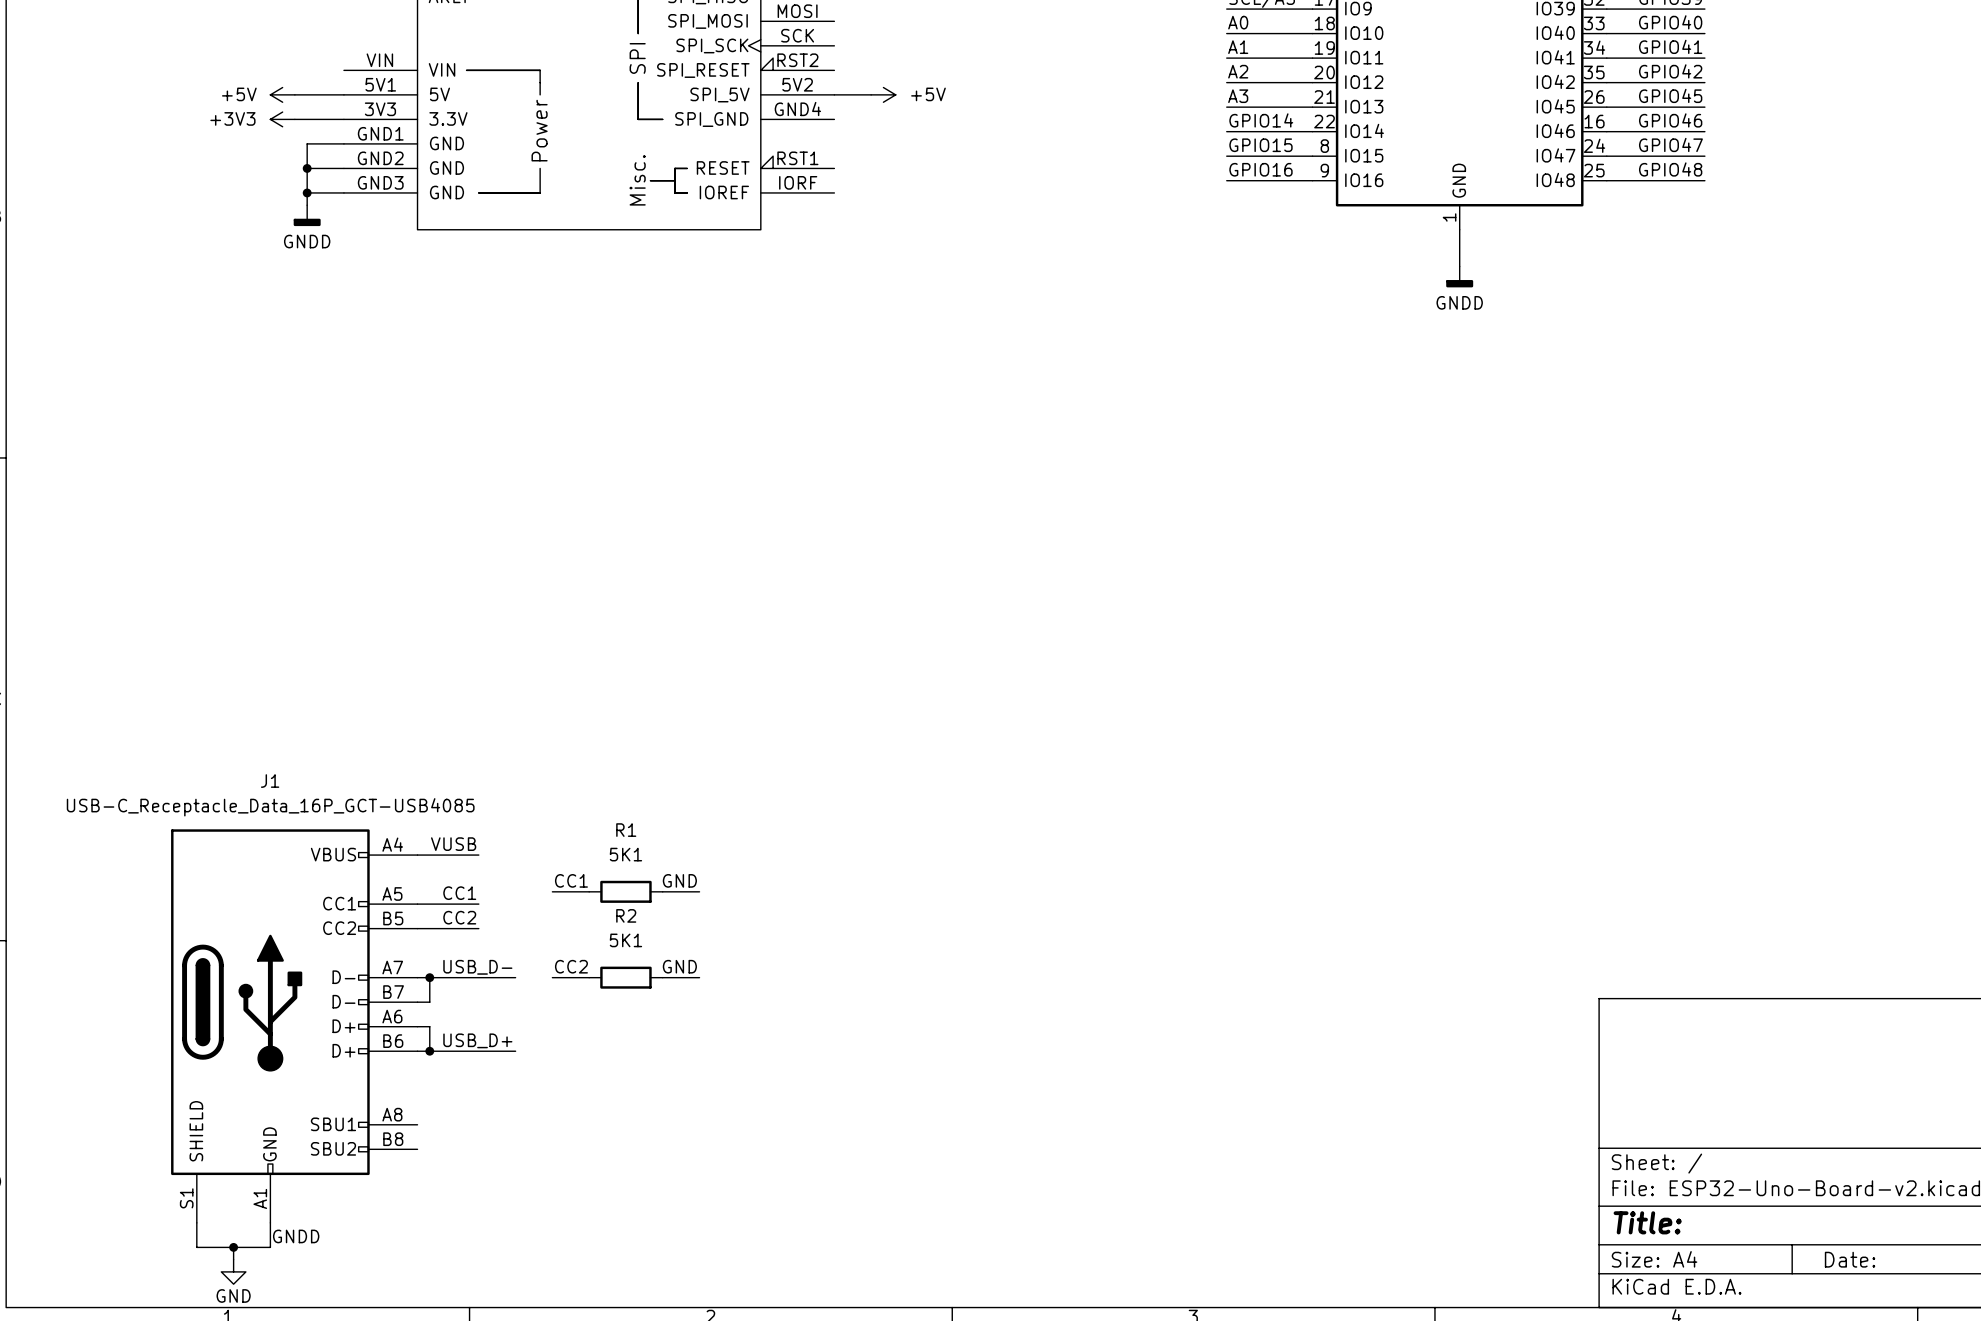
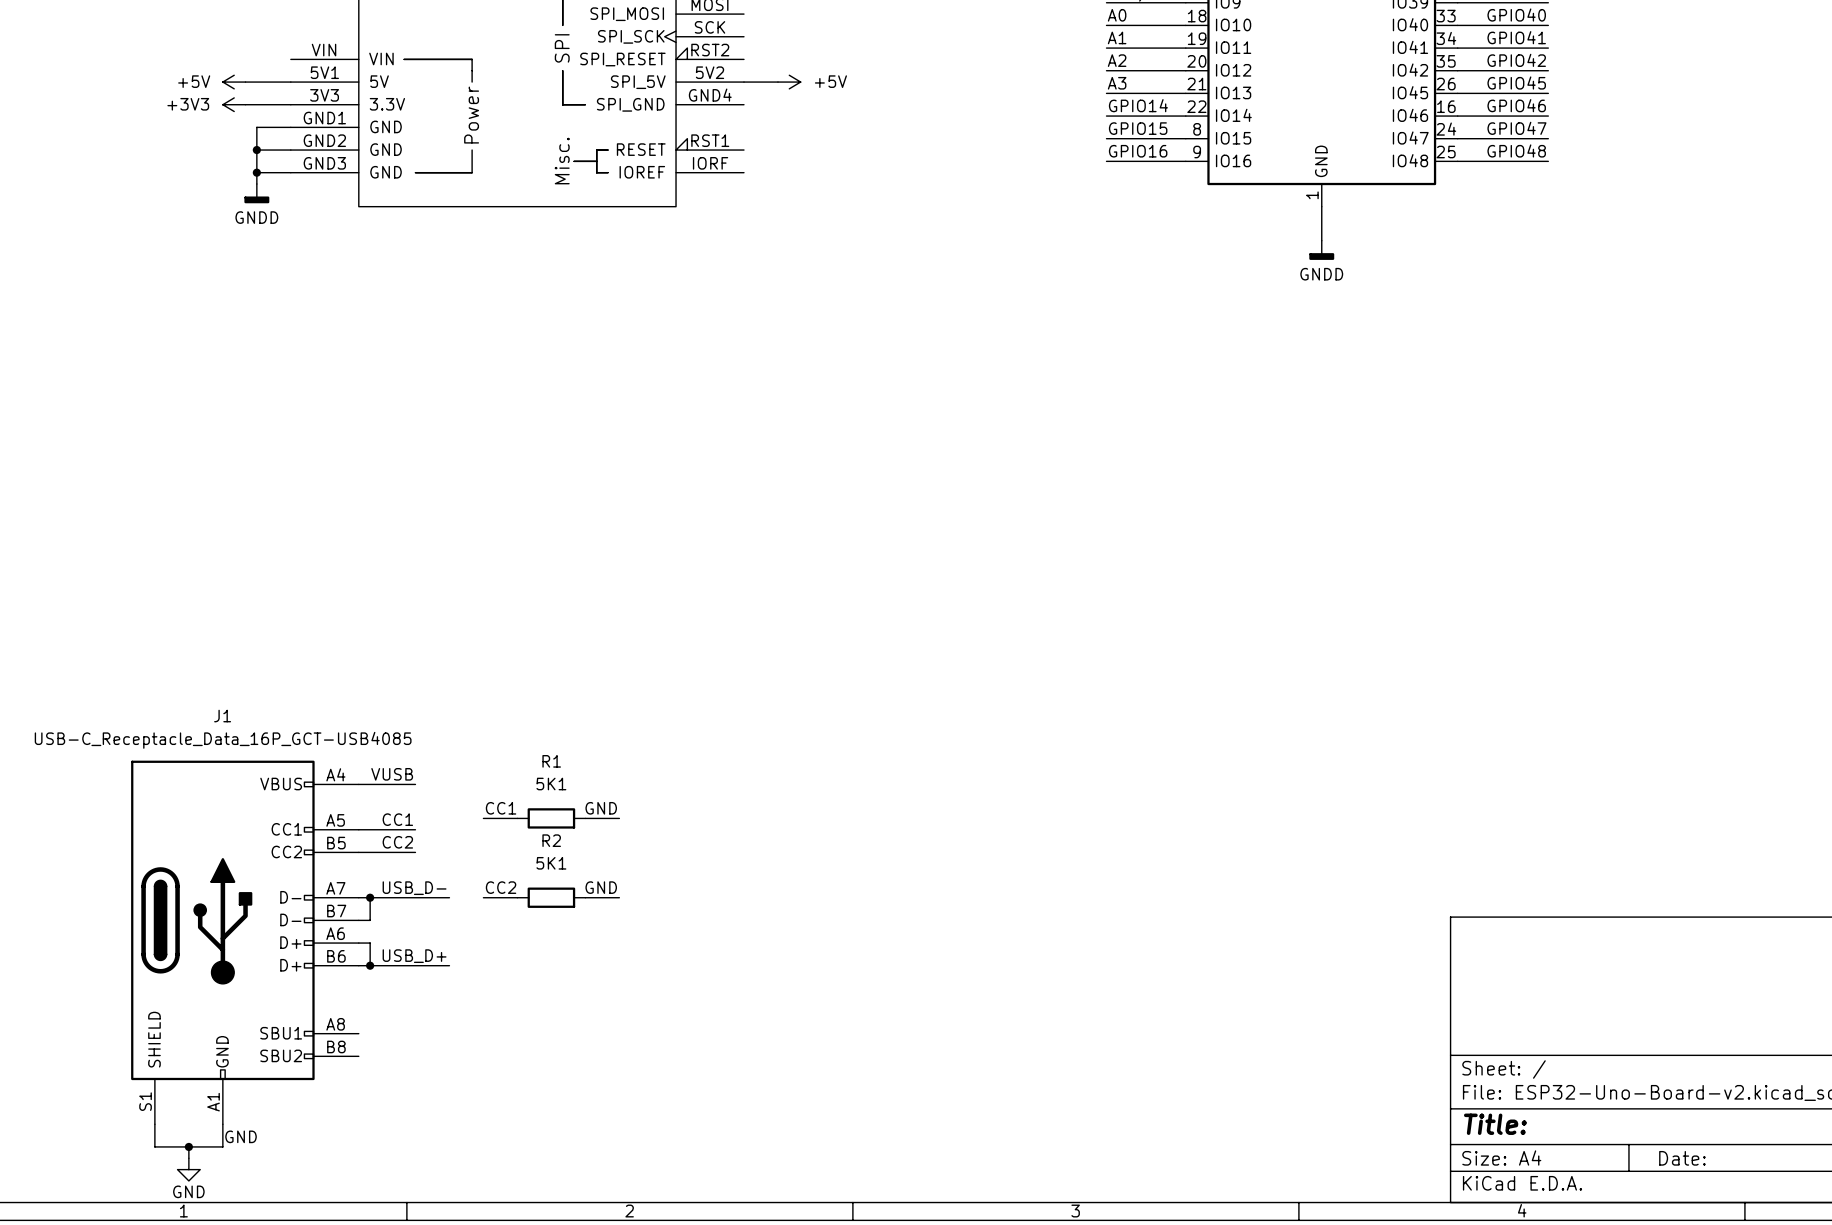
label: GNDD (296, 1236) -> GND (241, 1136)

